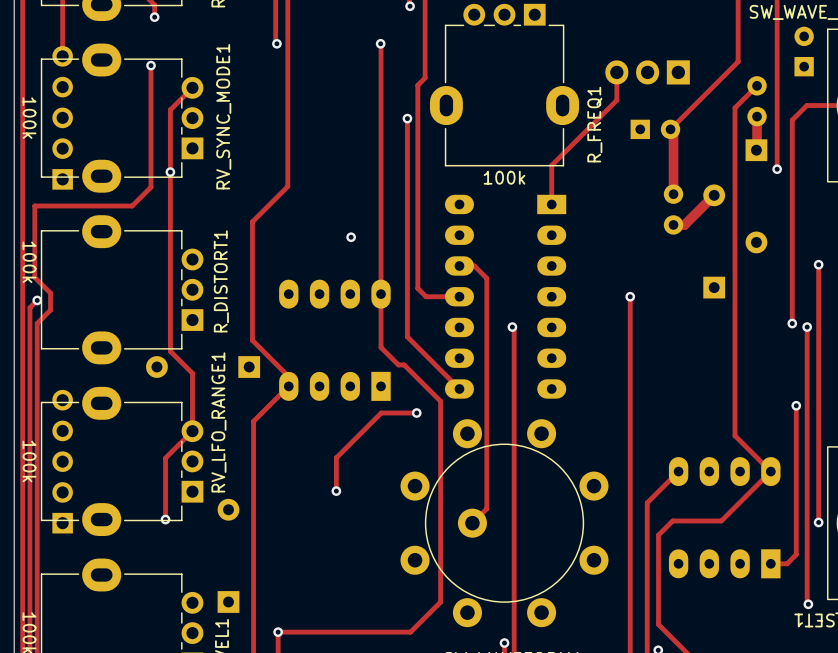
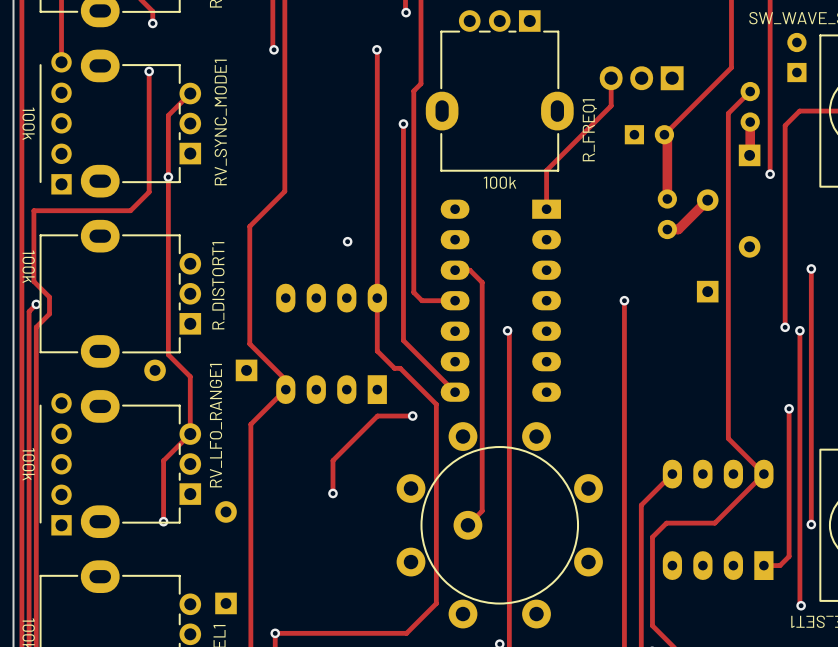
RV_SYNC_MODE1 footprint: [40, 43, 204, 193] -> [39, 49, 202, 198]
RV_LFO_RANGE1 footprint: [40, 386, 204, 537] -> [39, 390, 202, 539]

